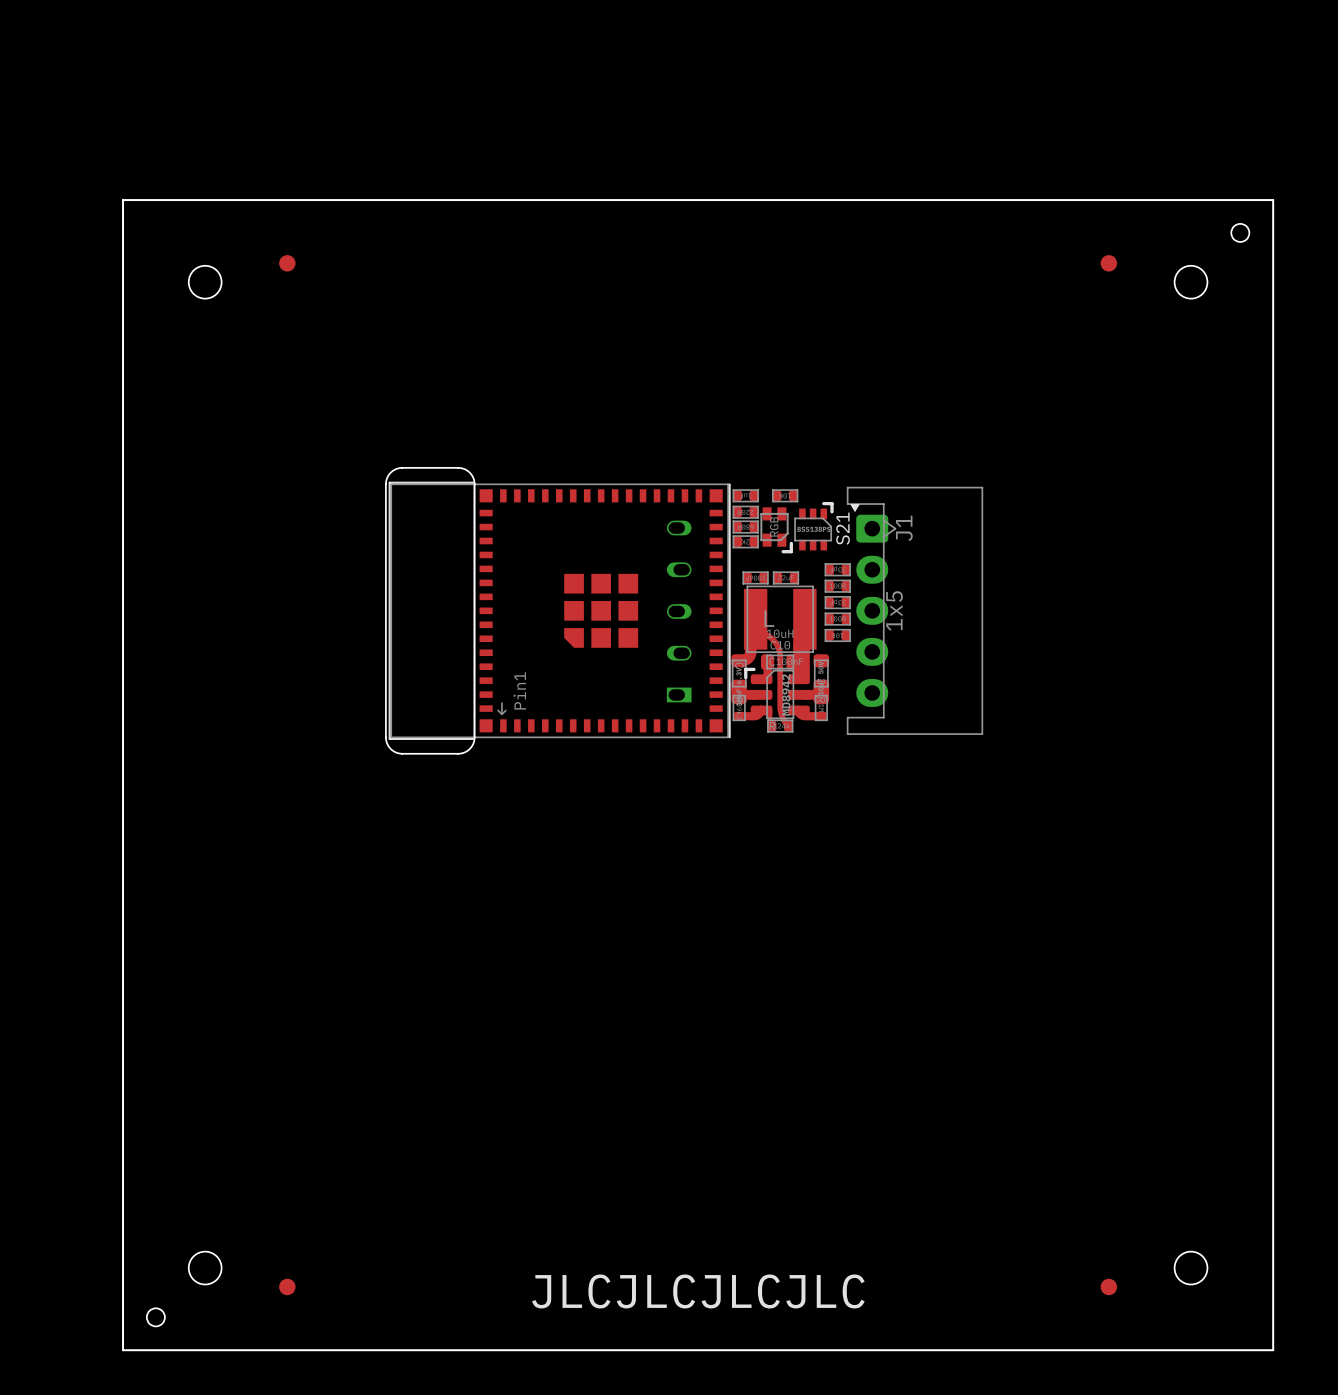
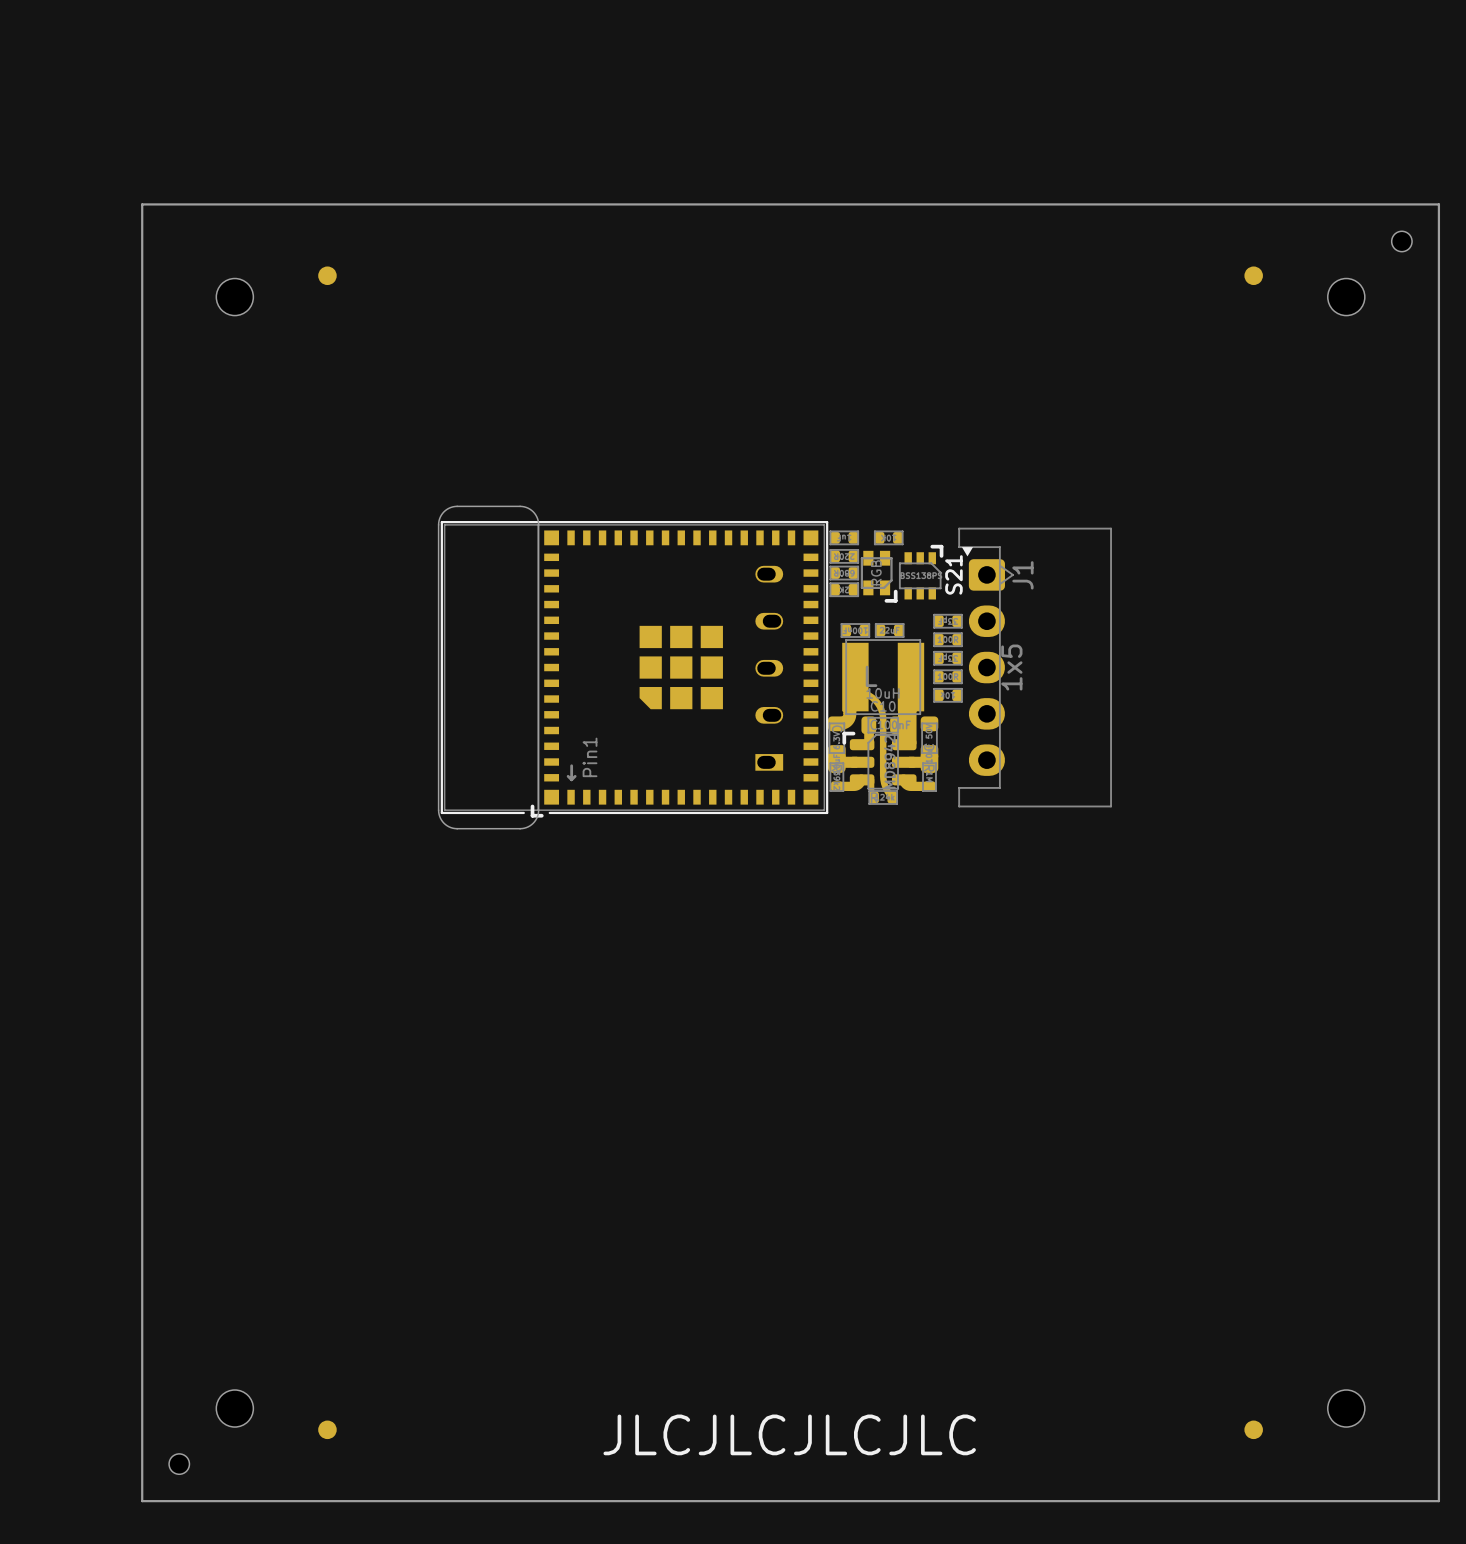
part footprint: [388, 481, 731, 740] -> [440, 521, 829, 818]

